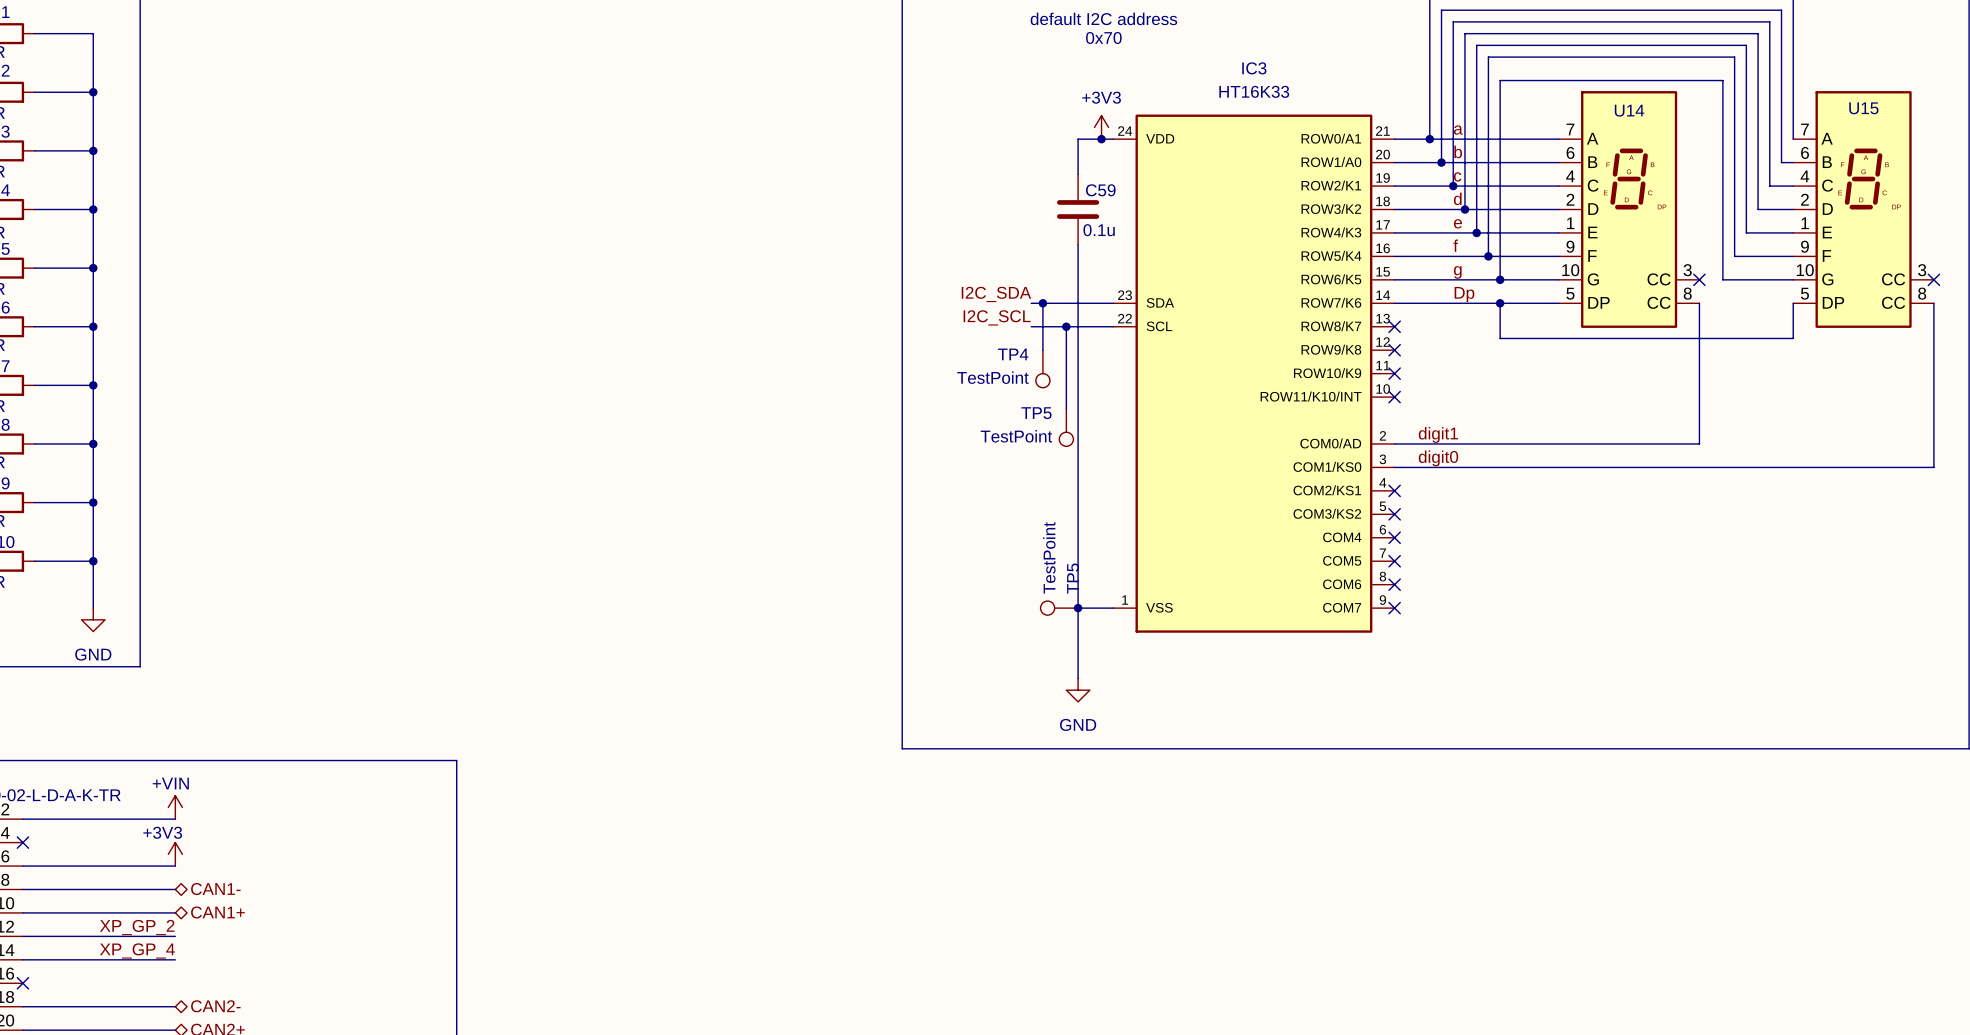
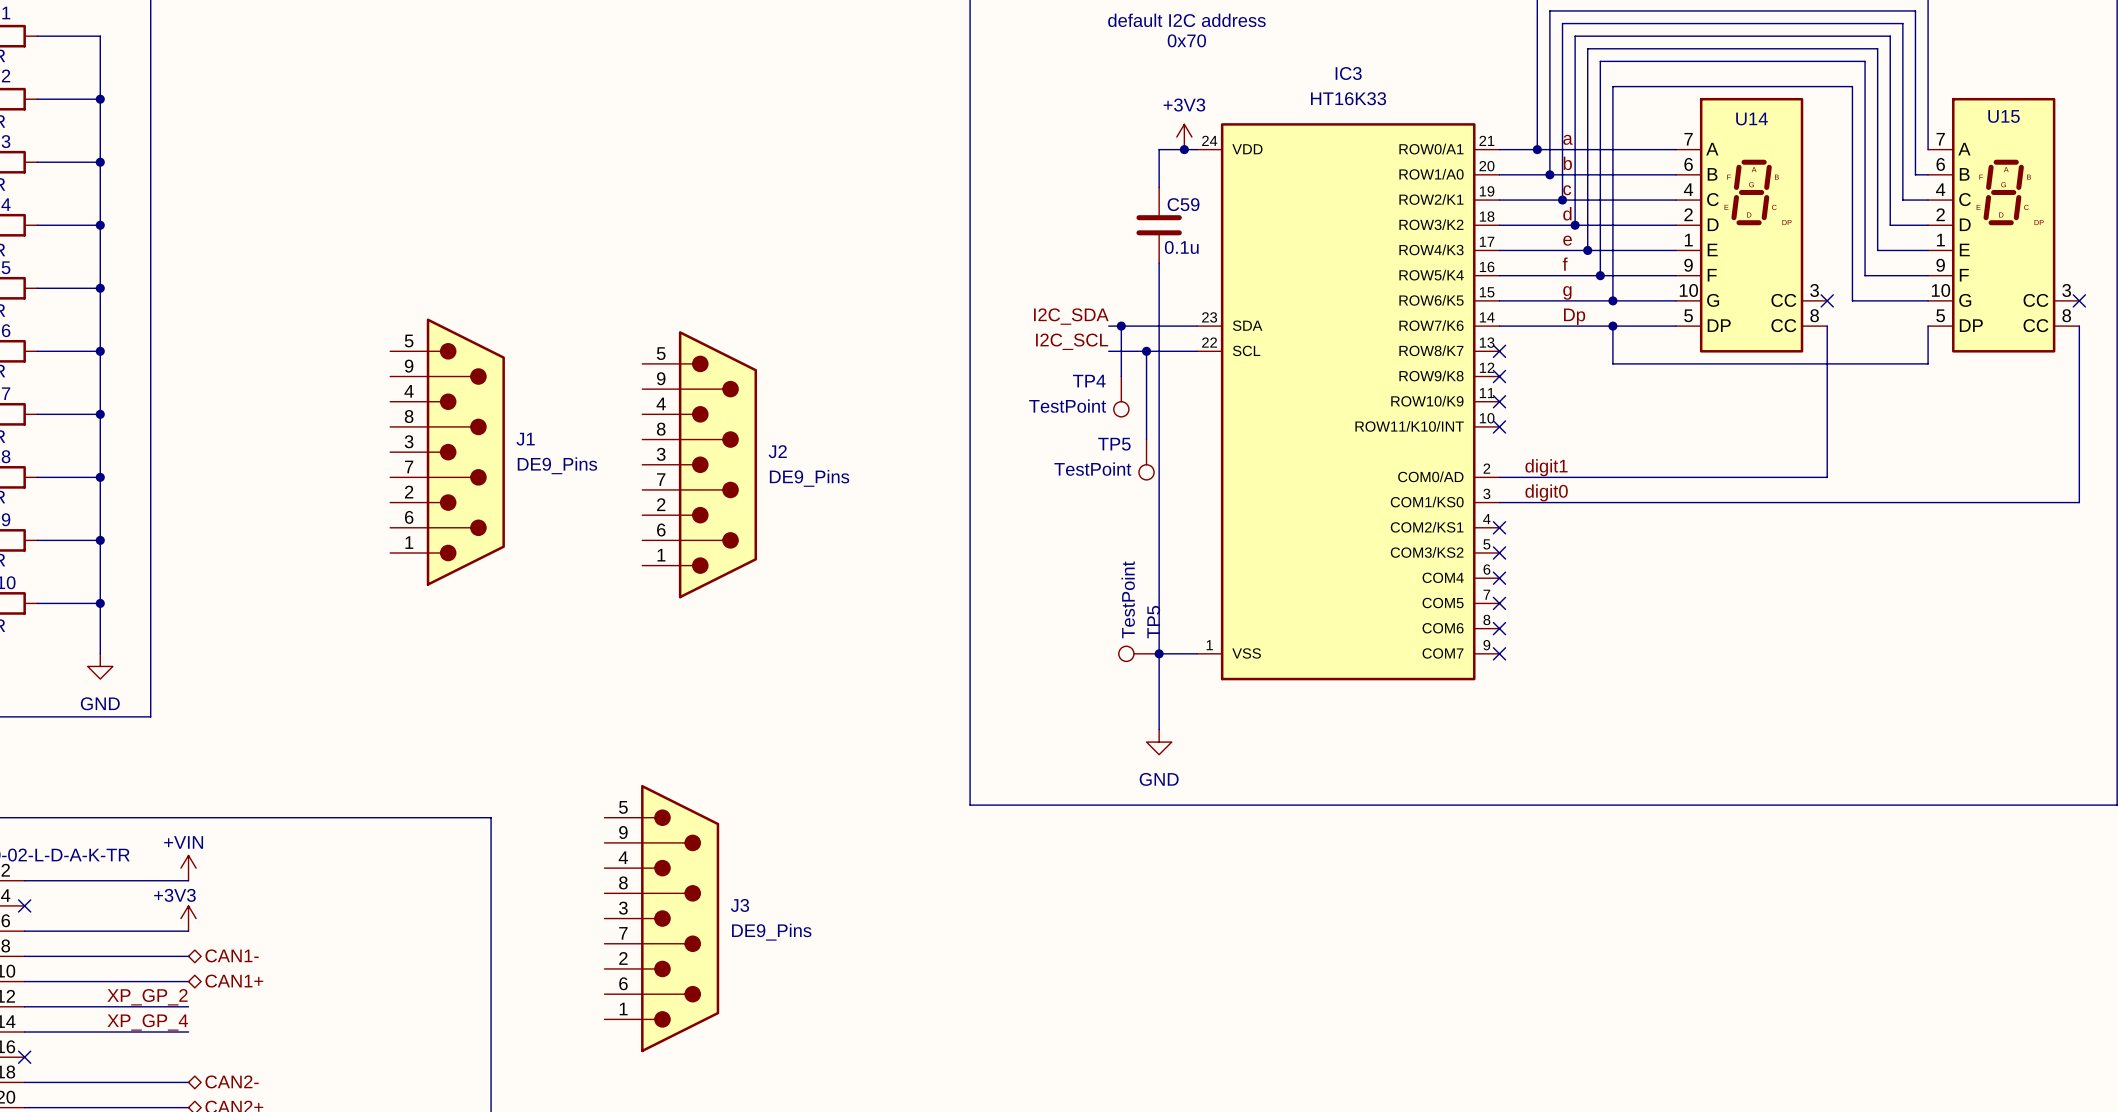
J1: none -> DE9_Pins (447, 452)
J2: none -> DE9_Pins (699, 464)
J3: none -> DE9_Pins (661, 918)

